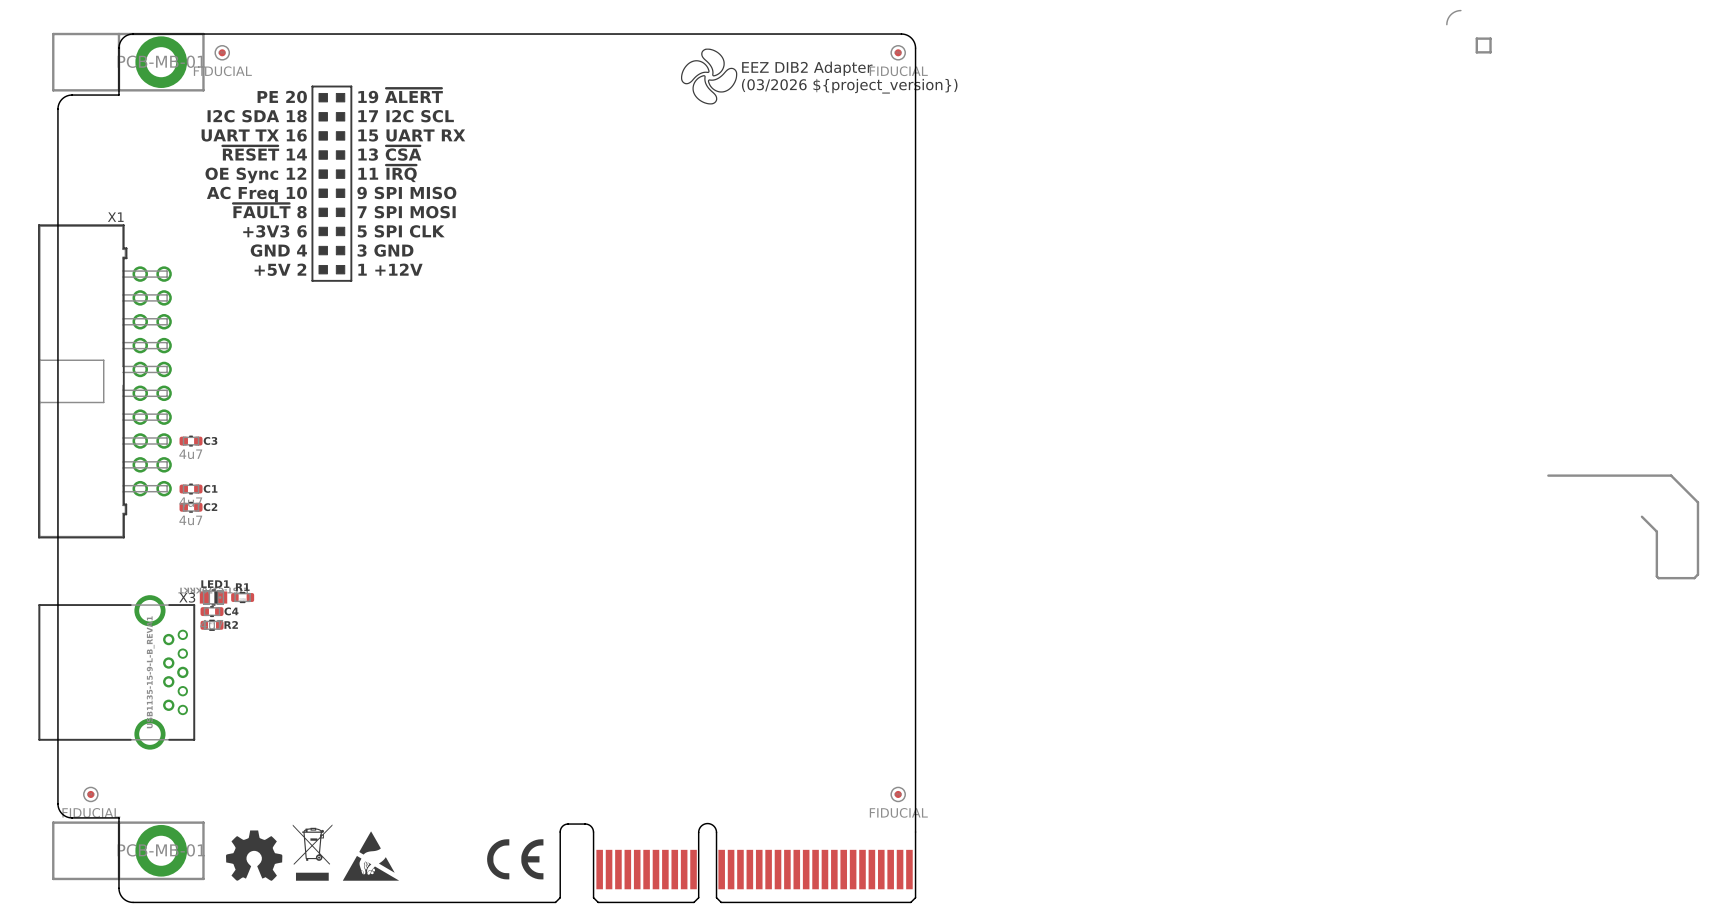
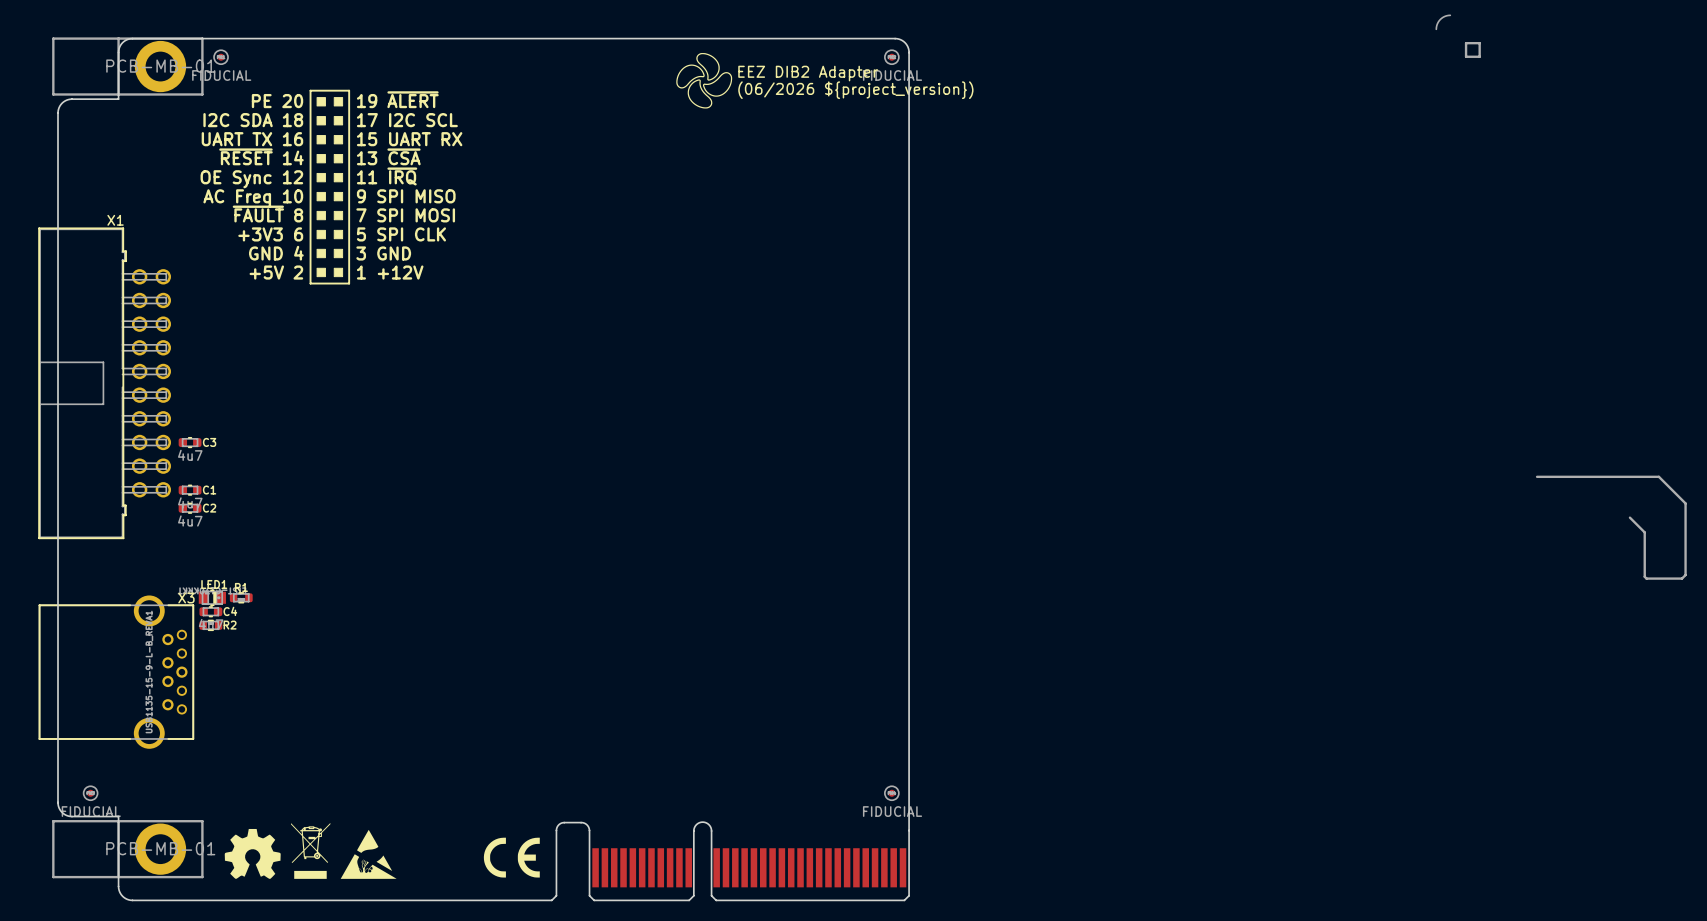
text: (03/2026 ${project_version}) (849, 86) -> (06/2026 ${project_version}) (855, 90)

